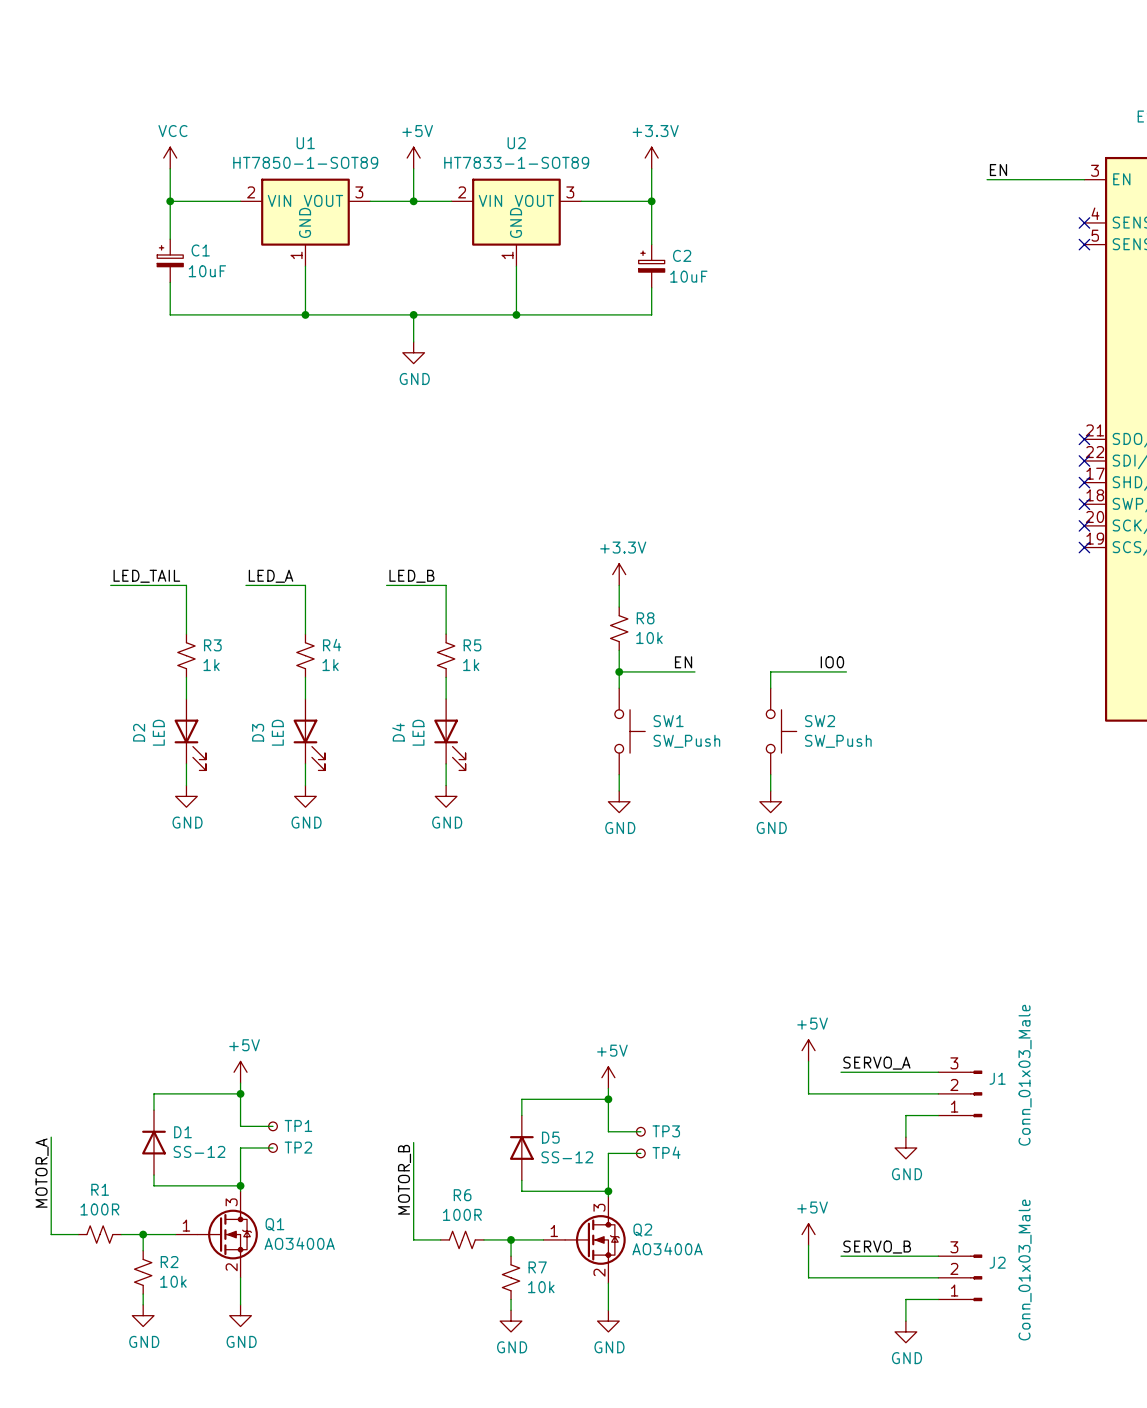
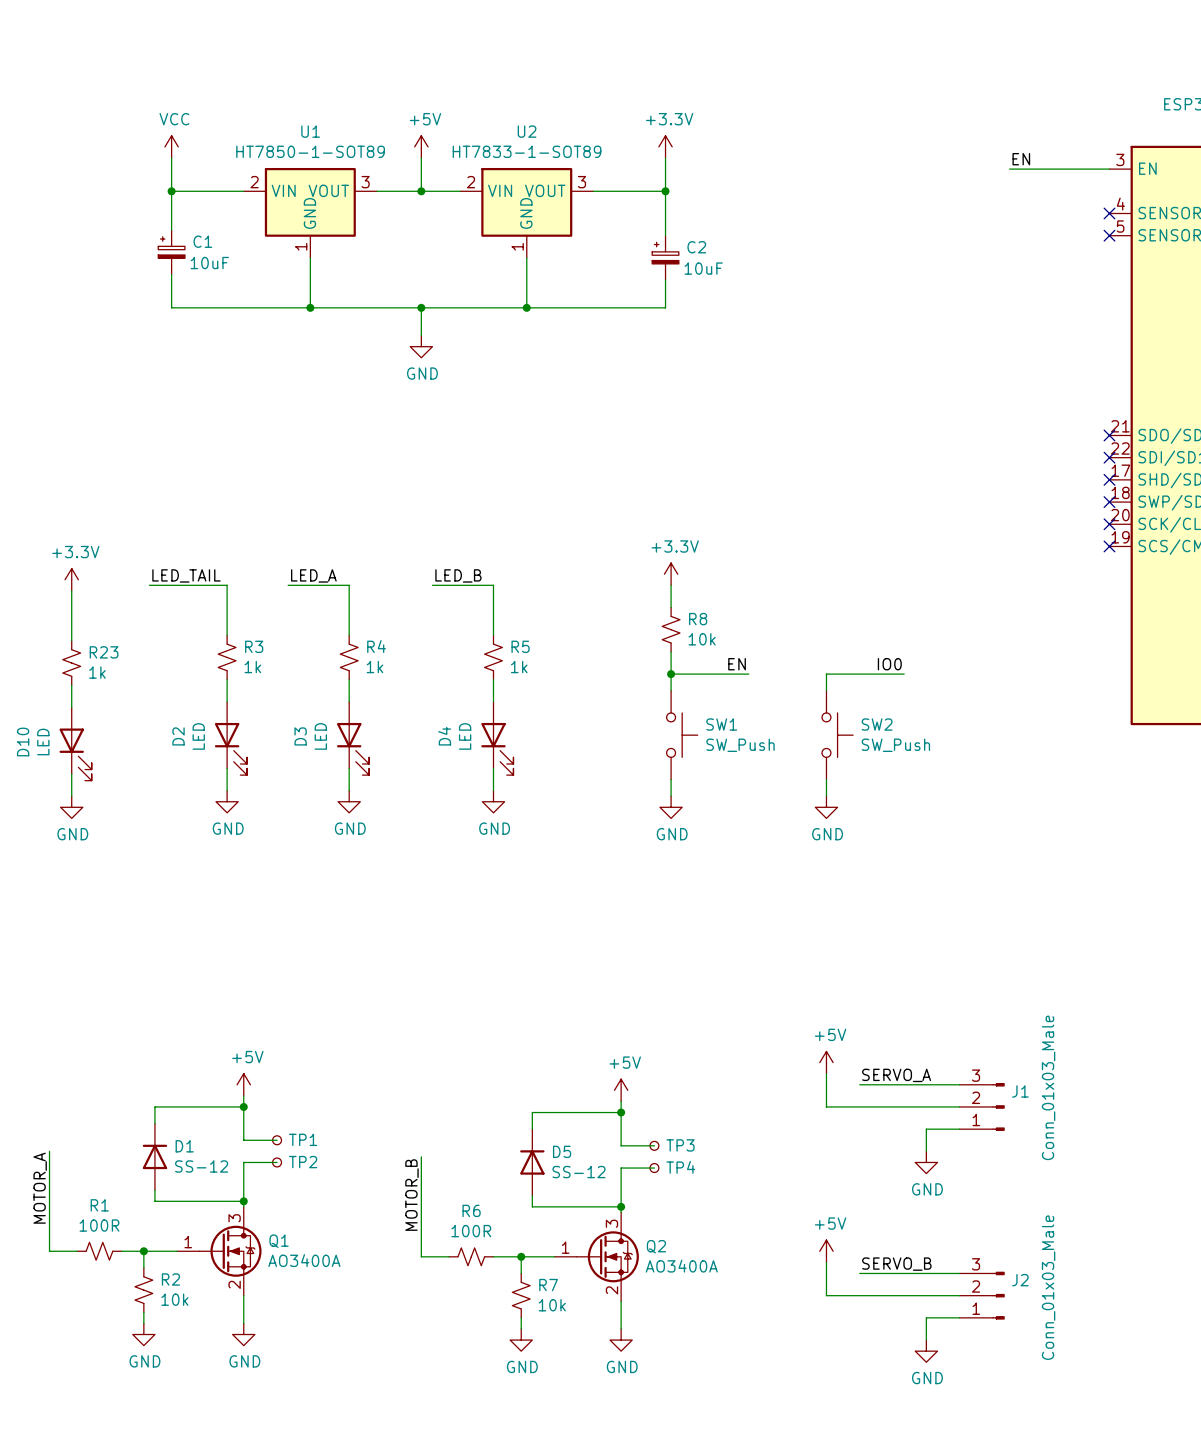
power symbol position: +3.3V (619, 574) -> +3.3V (671, 574)
label position: LED_TAIL (146, 576) -> LED_TAIL (186, 575)
label position: LED_A (271, 576) -> LED_A (313, 575)
label position: LED_B (411, 576) -> LED_B (458, 575)
power symbol: none -> +3.3V (71, 579)
wire: (110, 585) (148, 585) -> none
wire: (186, 585) (186, 634) -> (188, 585) (227, 585) (227, 635)
wire: (245, 585) (283, 585) -> none
wire: (305, 585) (305, 634) -> (310, 585) (349, 585) (349, 635)
wire: (386, 585) (424, 585) -> none
wire: (446, 585) (446, 634) -> (454, 585) (493, 585) (493, 635)
wire: (619, 585) (619, 607) -> (671, 585) (671, 607)
wire: none -> (71, 590) (71, 640)
R8 position: (619, 628) -> (671, 629)
wire: (619, 650) (619, 688) -> (671, 651) (671, 690)
R3 position: (186, 655) -> (227, 657)
R4 position: (305, 655) -> (349, 657)
R5 position: (446, 655) -> (493, 657)
R23: none -> 1k (71, 663)
label position: EN (683, 662) -> EN (737, 664)
label position: IO0 (832, 662) -> IO0 (889, 664)
wire: (619, 671) (657, 671) -> (709, 674) (748, 674)
junction position: (619, 671) -> (671, 674)
wire: (808, 671) (770, 671) (770, 688) -> (826, 674) (826, 690)
wire: none -> (865, 674) (904, 674)
wire: (186, 677) (186, 699) -> (227, 679) (227, 701)
wire: (305, 677) (305, 699) -> (349, 679) (349, 701)
wire: (446, 677) (446, 699) -> (493, 679) (493, 701)
wire: none -> (71, 685) (71, 707)
SW1 position: (630, 731) -> (682, 735)
SW2 position: (781, 731) -> (837, 735)
D2 position: (190, 734) -> (230, 738)
D3 position: (309, 734) -> (353, 738)
D4 position: (449, 734) -> (497, 738)
D10: none -> LED (75, 744)
wire: (186, 763) (186, 785) -> (227, 768) (227, 790)
wire: (305, 763) (305, 785) -> (349, 768) (349, 790)
wire: (446, 763) (446, 785) -> (493, 768) (493, 790)
wire: none -> (71, 774) (71, 796)
wire: (619, 774) (619, 790) -> (671, 779) (671, 796)
wire: (770, 774) (770, 790) -> (826, 779) (826, 796)
power symbol position: GND (186, 796) -> GND (227, 801)
power symbol position: GND (305, 796) -> GND (349, 801)
power symbol position: GND (446, 796) -> GND (493, 801)
power symbol: none -> GND (71, 807)
power symbol position: GND (619, 801) -> GND (671, 807)
power symbol position: GND (770, 801) -> GND (826, 807)

